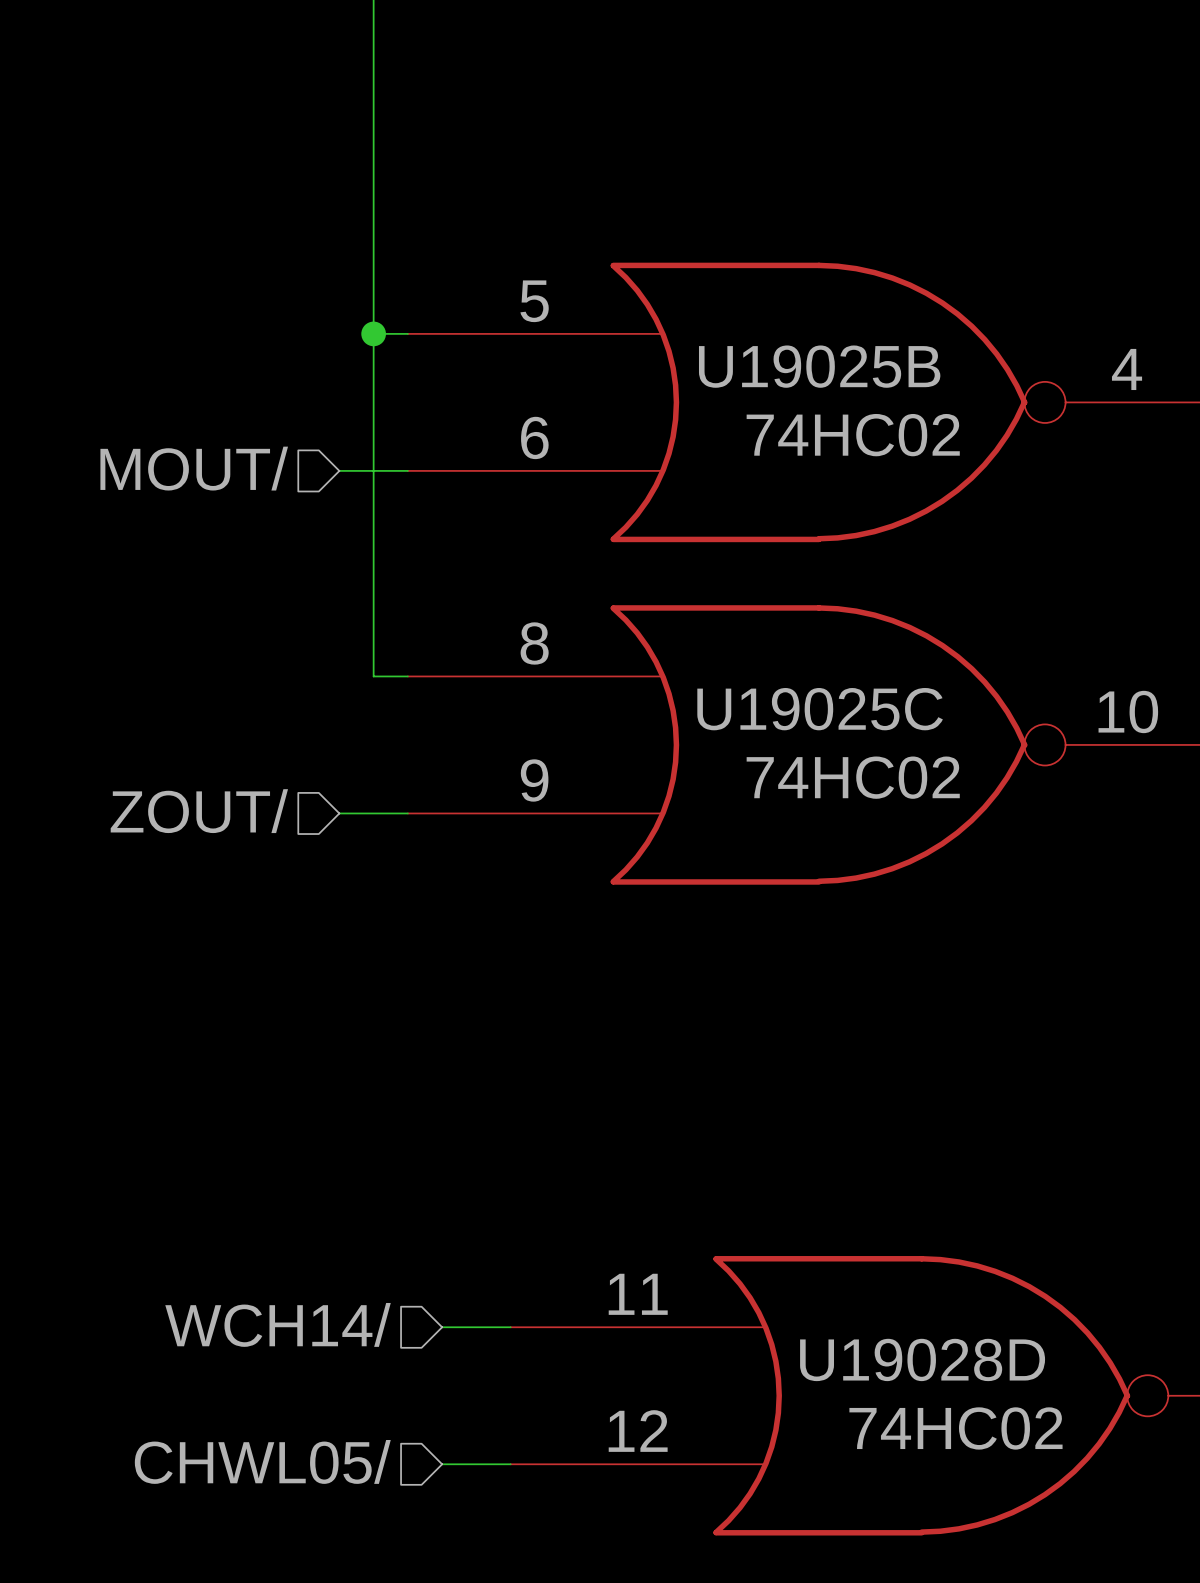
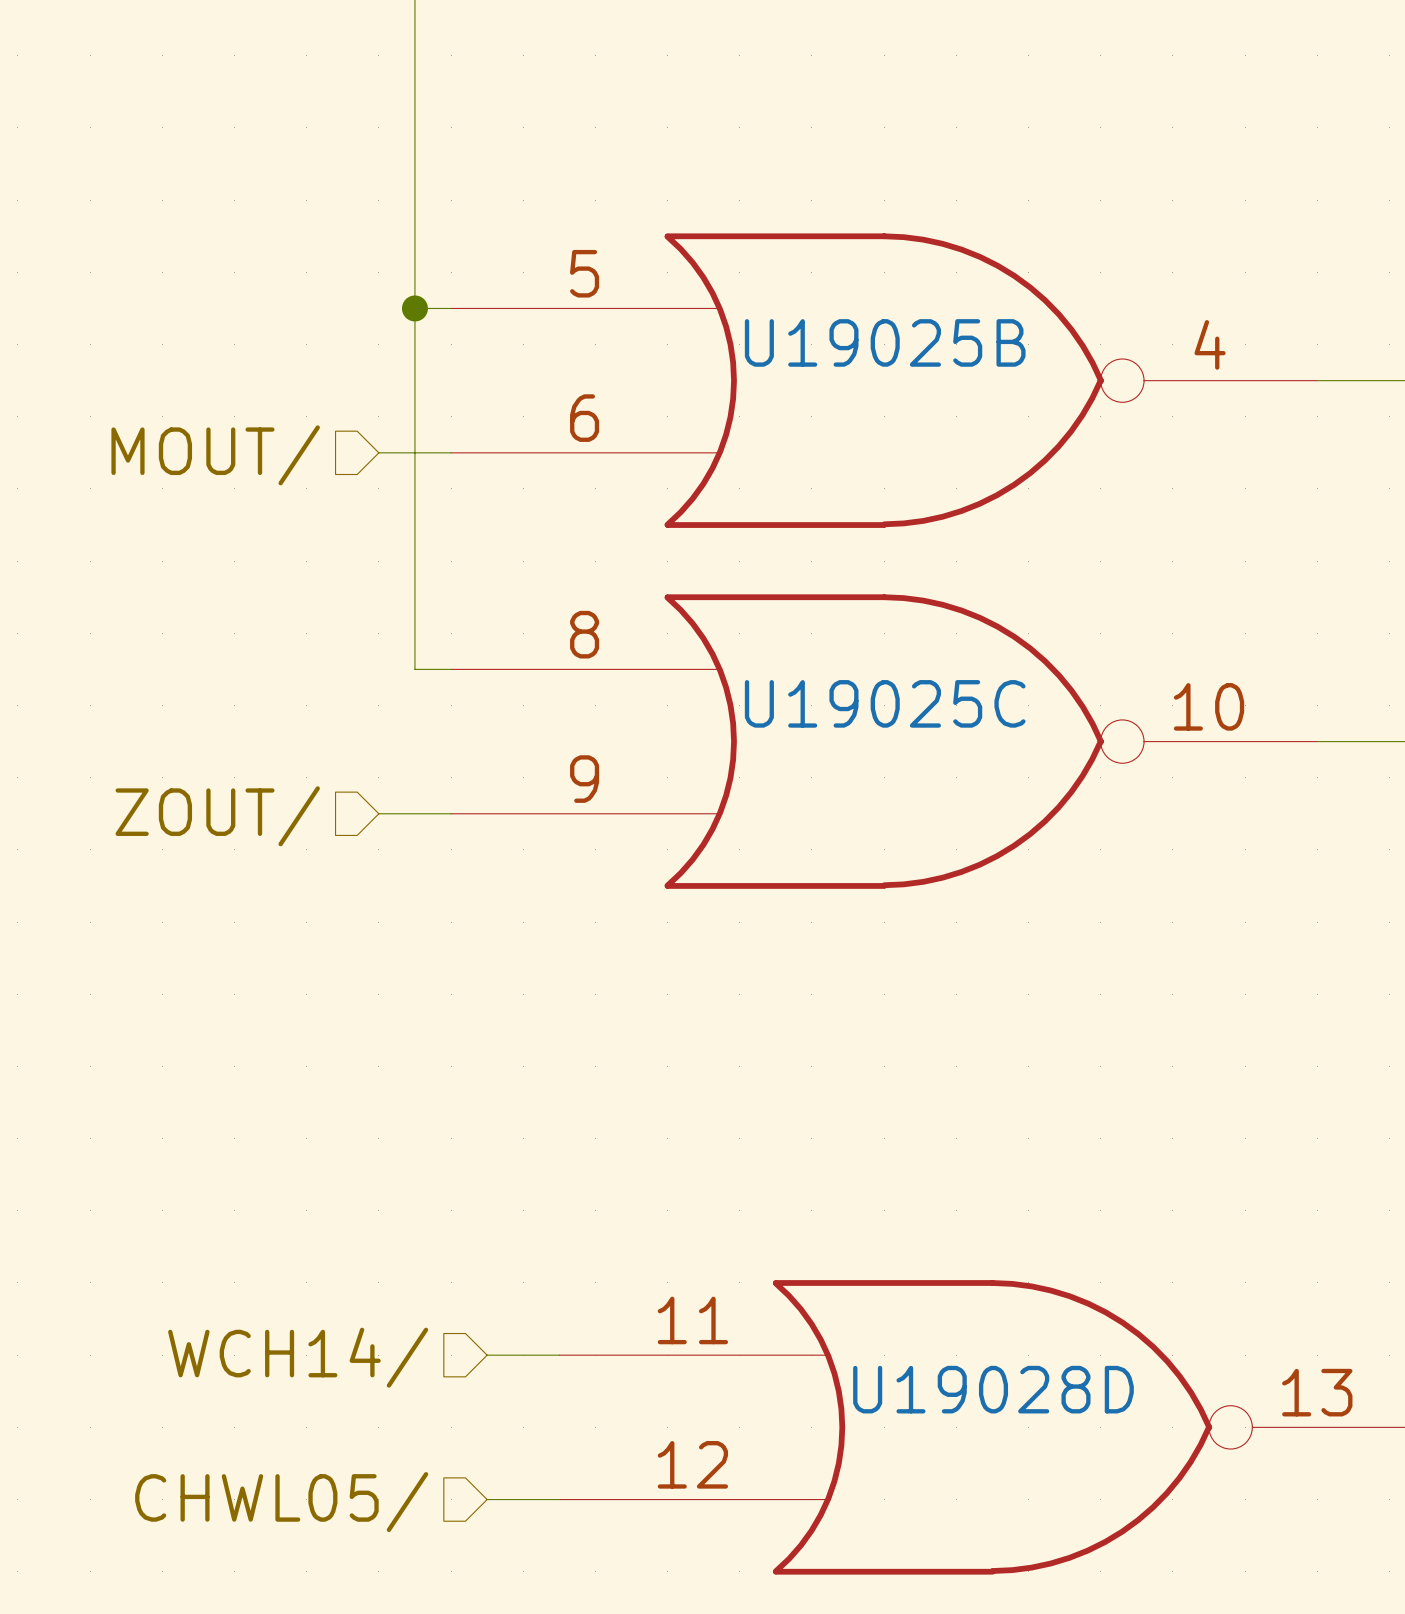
U19025B value: 74HC02 (853, 435) -> none
U19025C value: 74HC02 (853, 777) -> none
U19028D value: 74HC02 (955, 1428) -> none

